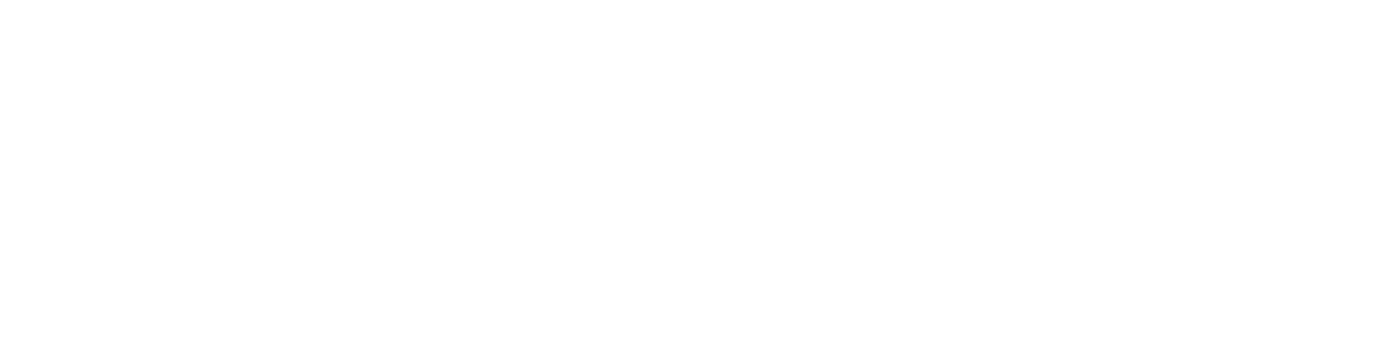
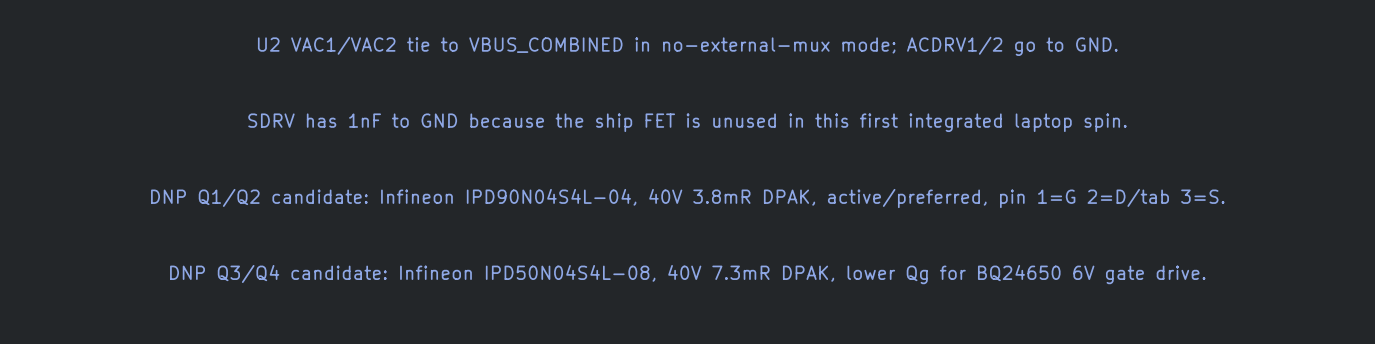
text: none -> U2 VAC1/VAC2 tie to VBUS_COMBINED in no-external-mux mode; ACDRV1/2 go to GND. (687, 46)
text: none -> SDRV has 1nF to GND because the ship FET is unused in this first integrated laptop spin. (687, 122)
text: none -> DNP Q1/Q2 candidate: Infineon IPD90N04S4L-04, 40V 3.8mR DPAK, active/preferred, pin 1=G 2=D/tab 3=S. (687, 198)
text: none -> DNP Q3/Q4 candidate: Infineon IPD50N04S4L-08, 40V 7.3mR DPAK, lower Qg for BQ24650 6V gate drive. (687, 274)

